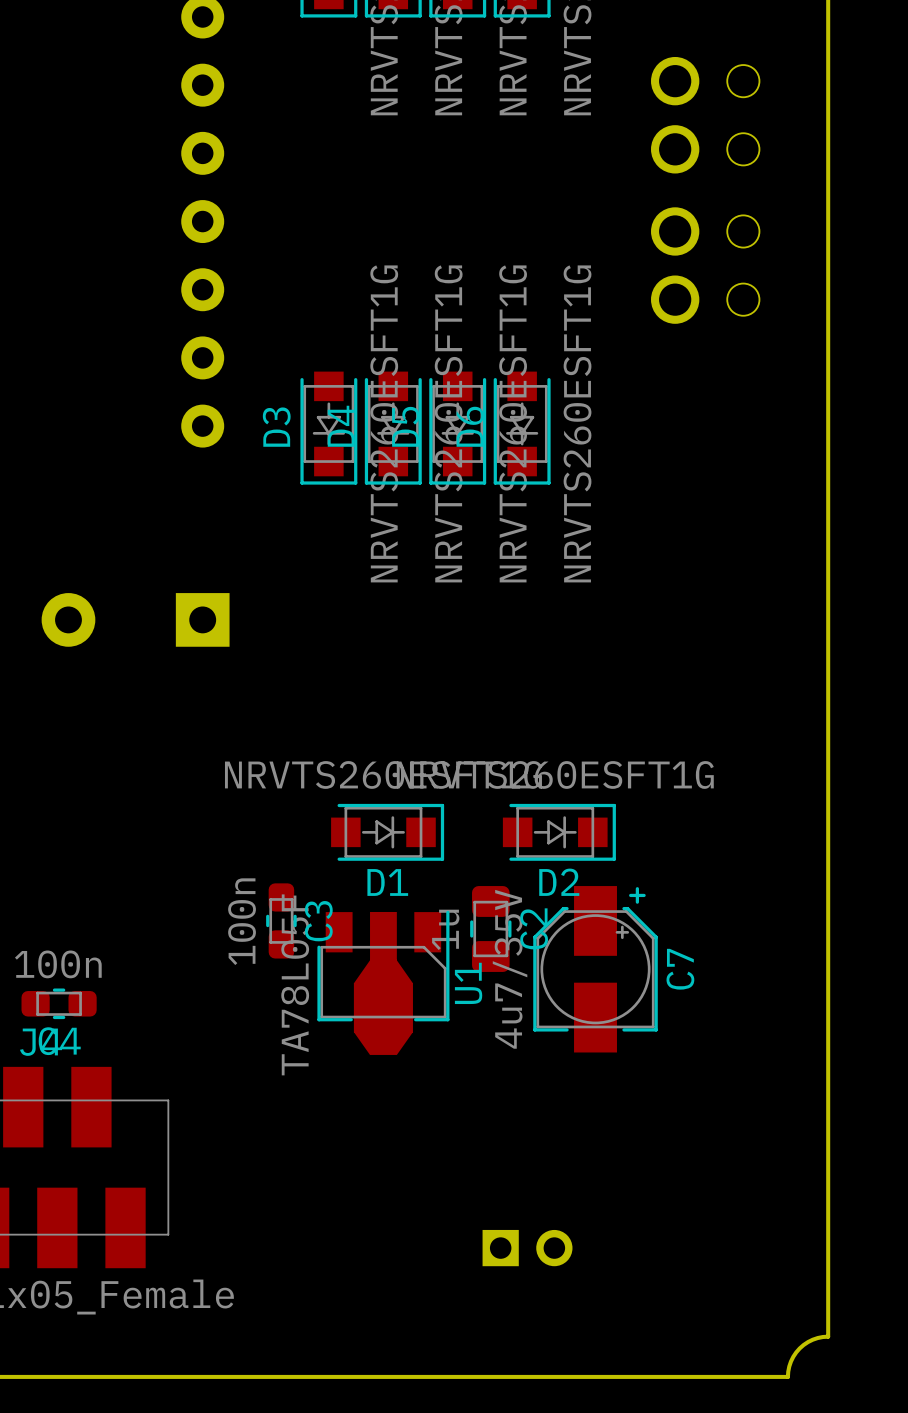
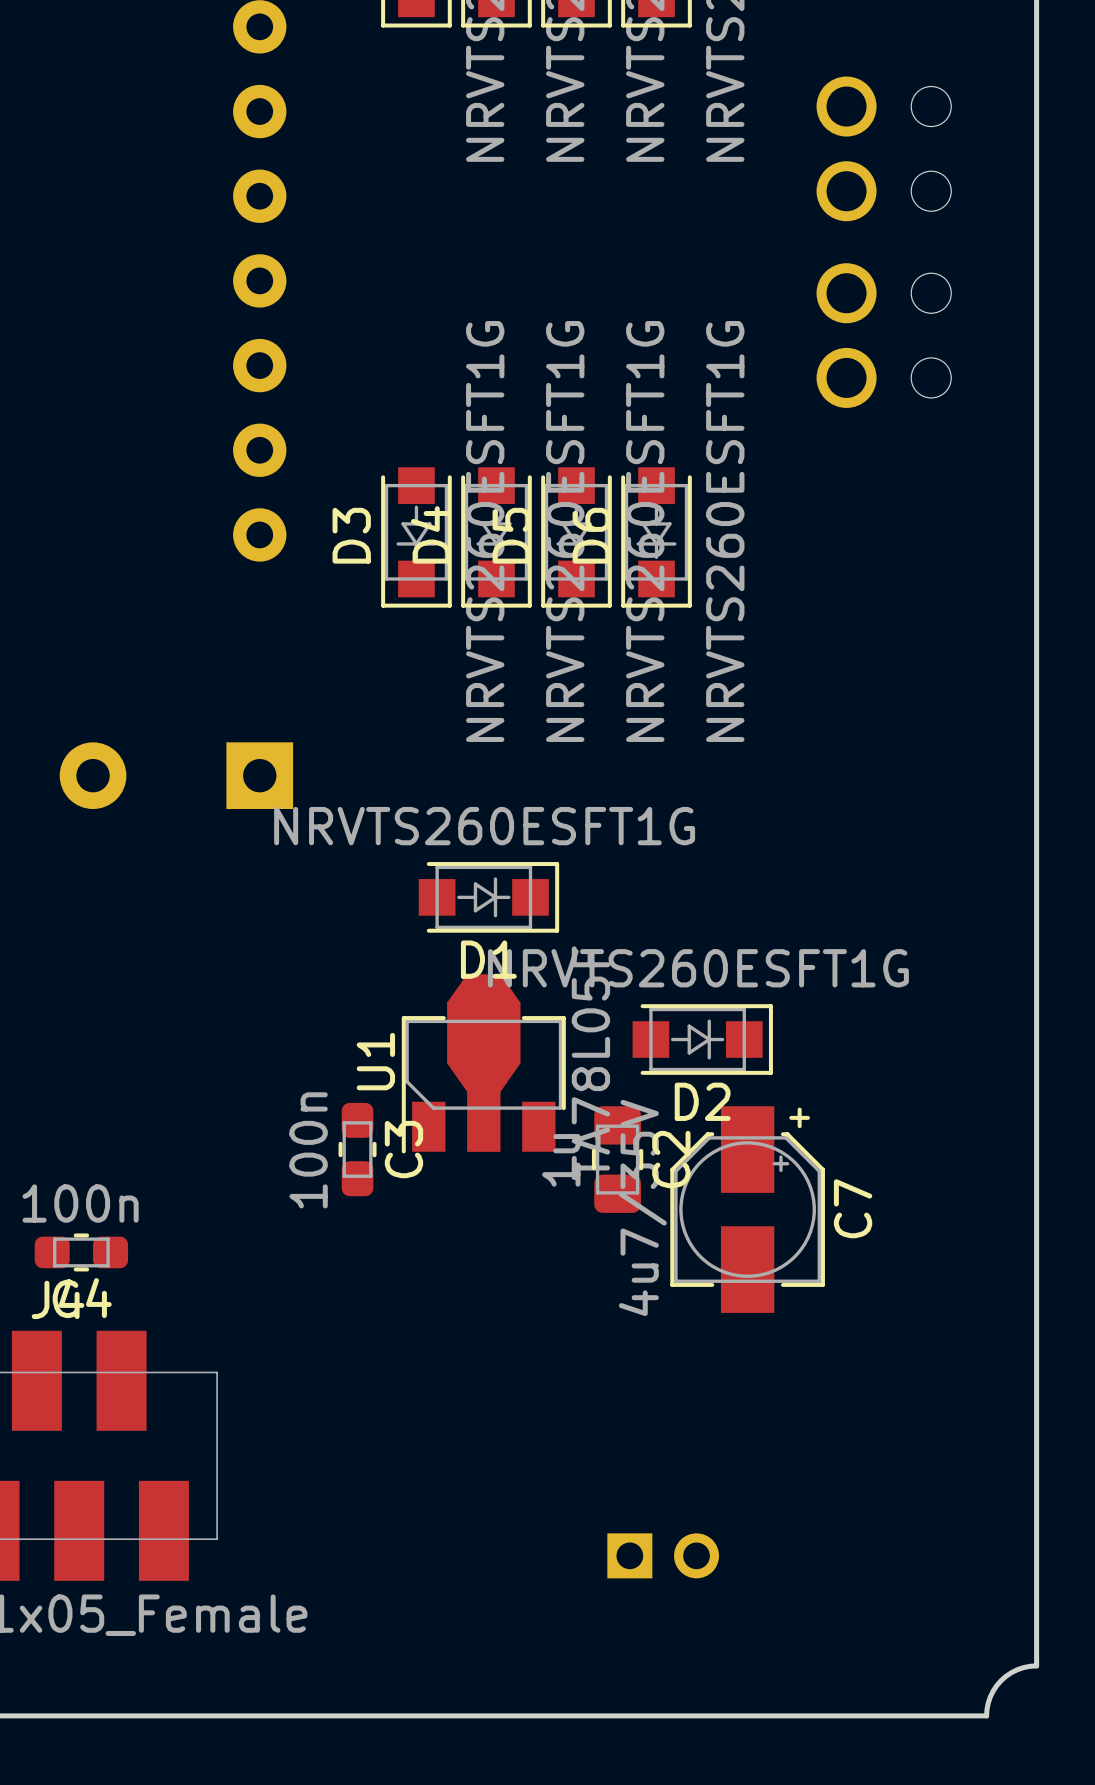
D1 position: (387, 832) -> (488, 897)
U1 rotation: 0° (383, 982) -> 180° (483, 1063)
U1 position: (383, 982) -> (483, 1063)

